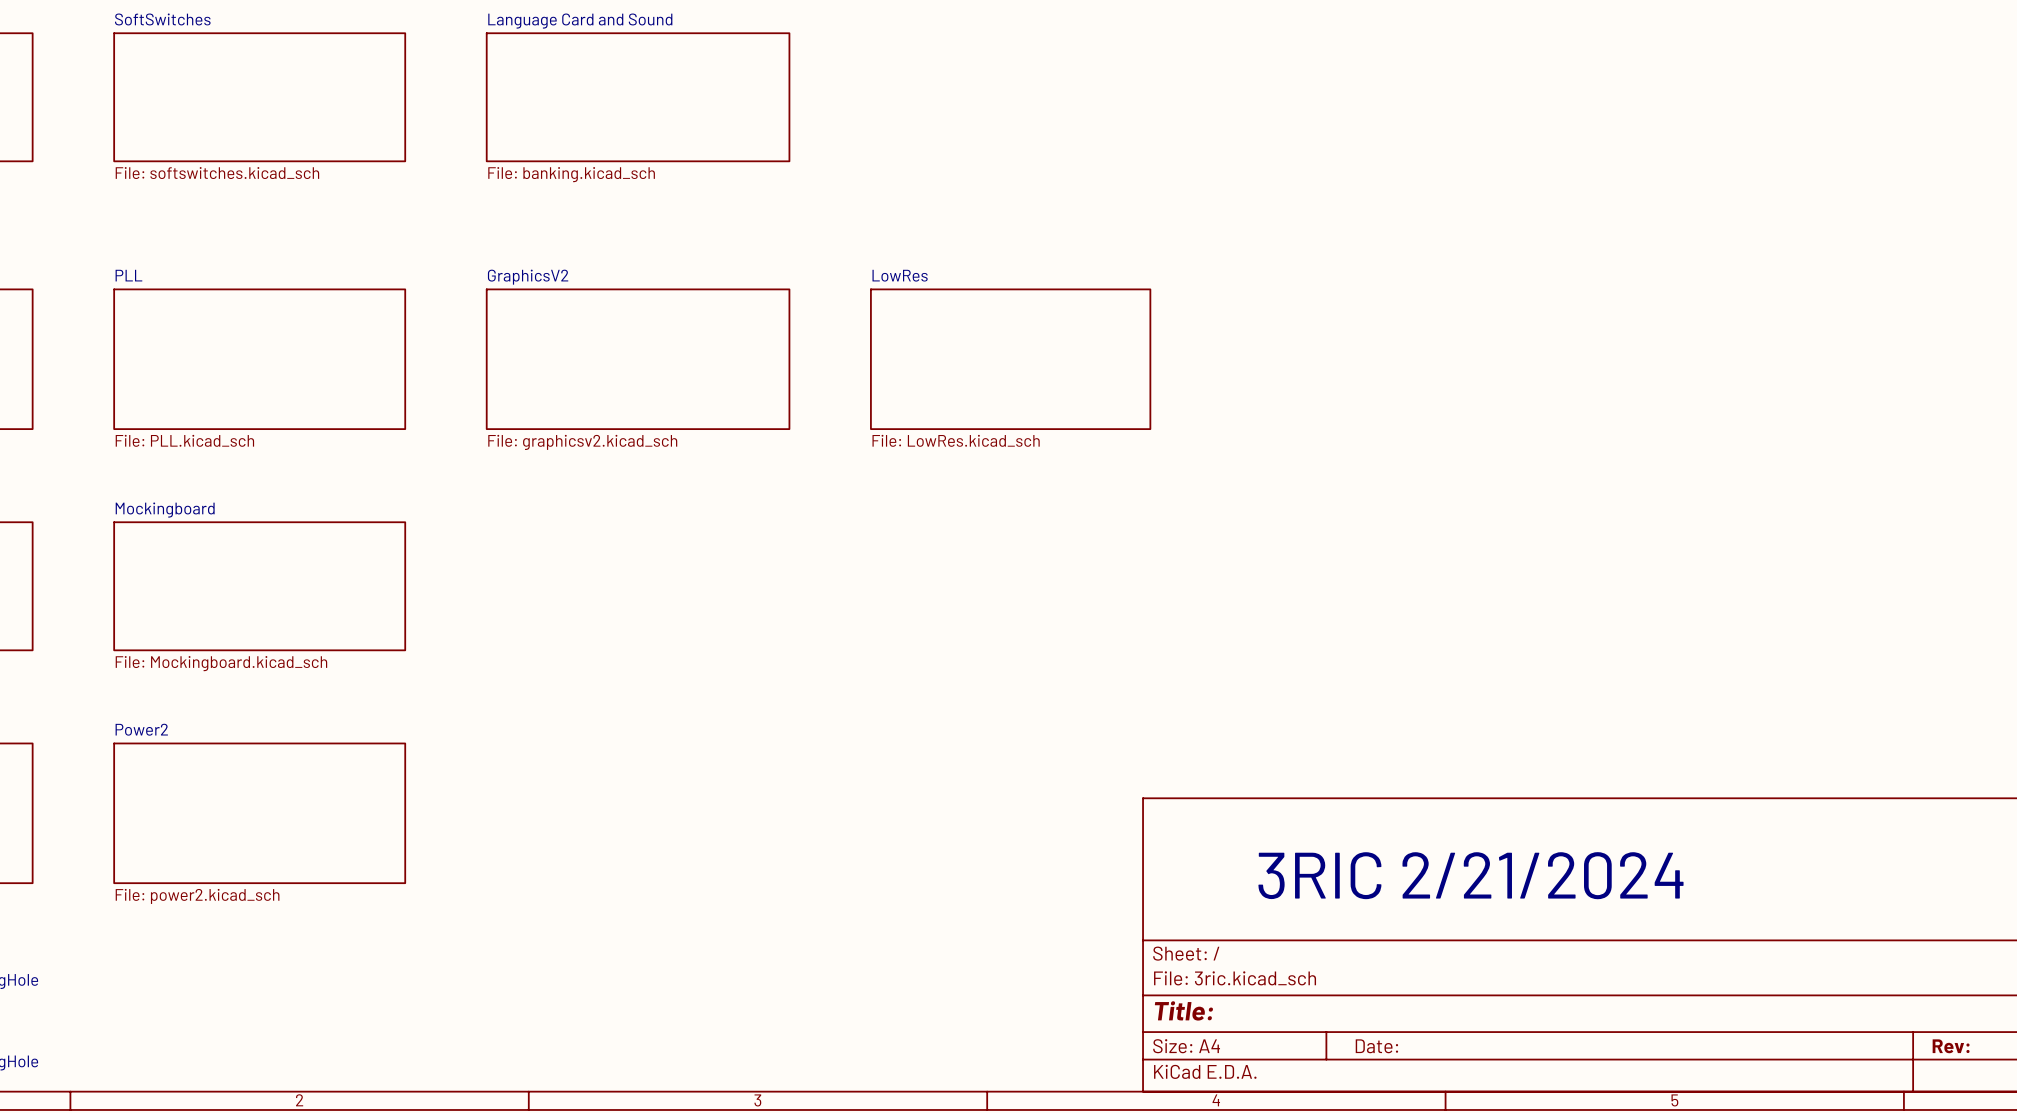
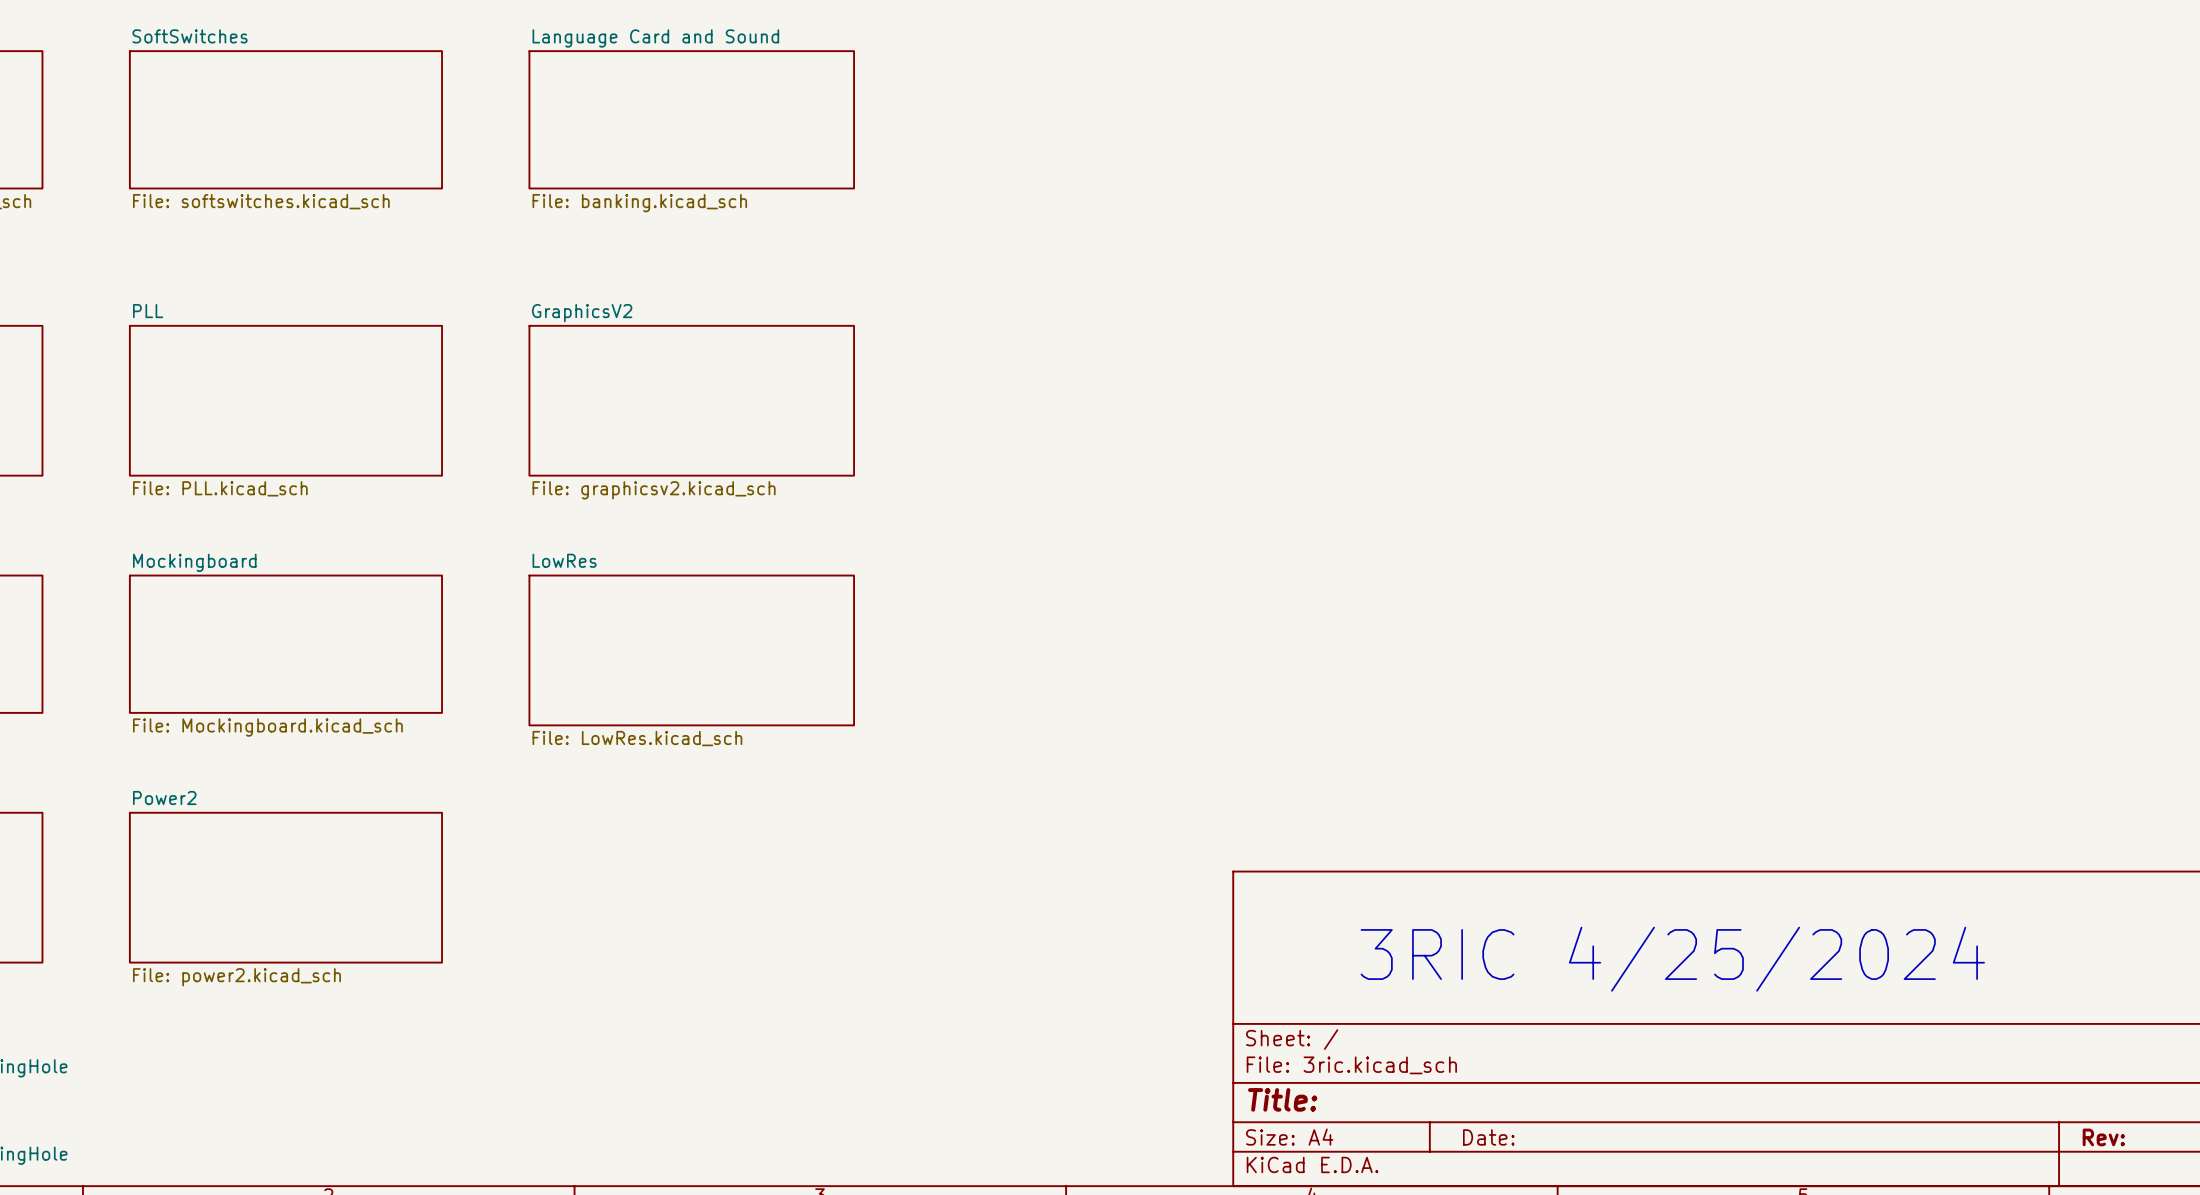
sheet LowRes: File: LowRes.kicad_sch (1010, 359) -> none
sheet LowRes: none -> File: LowRes.kicad_sch (691, 650)
text: 3RIC 2/21/2024 (1470, 875) -> 3RIC 4/25/2024 (1672, 959)

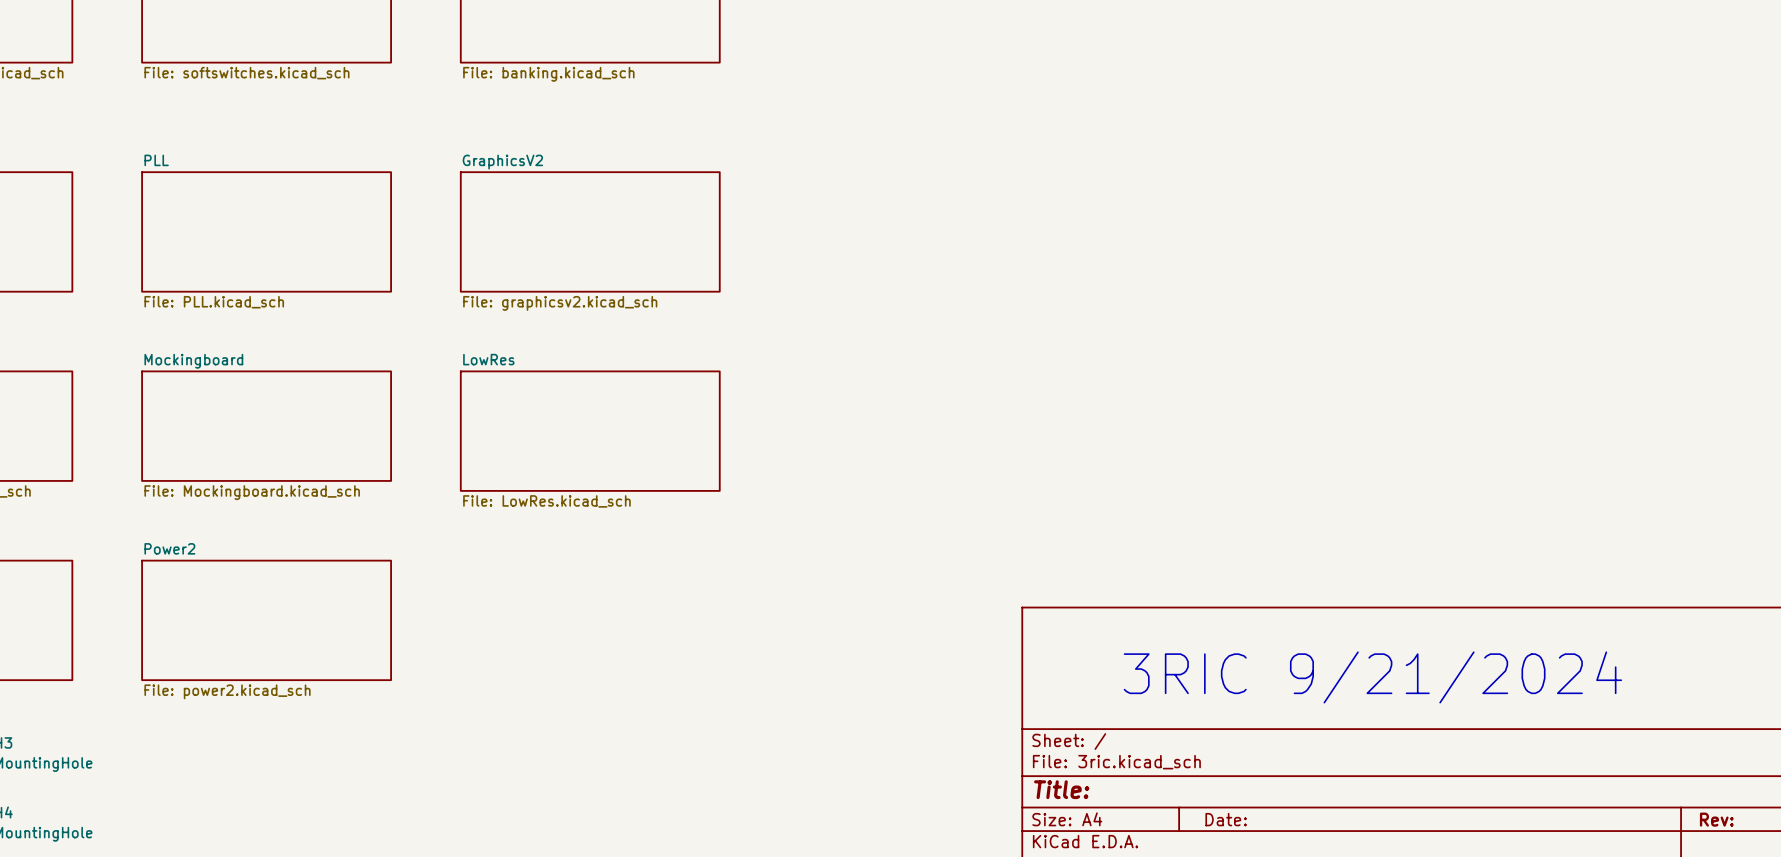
text: 3RIC 4/25/2024 (1672, 959) -> 3RIC 9/21/2024 (1372, 677)

